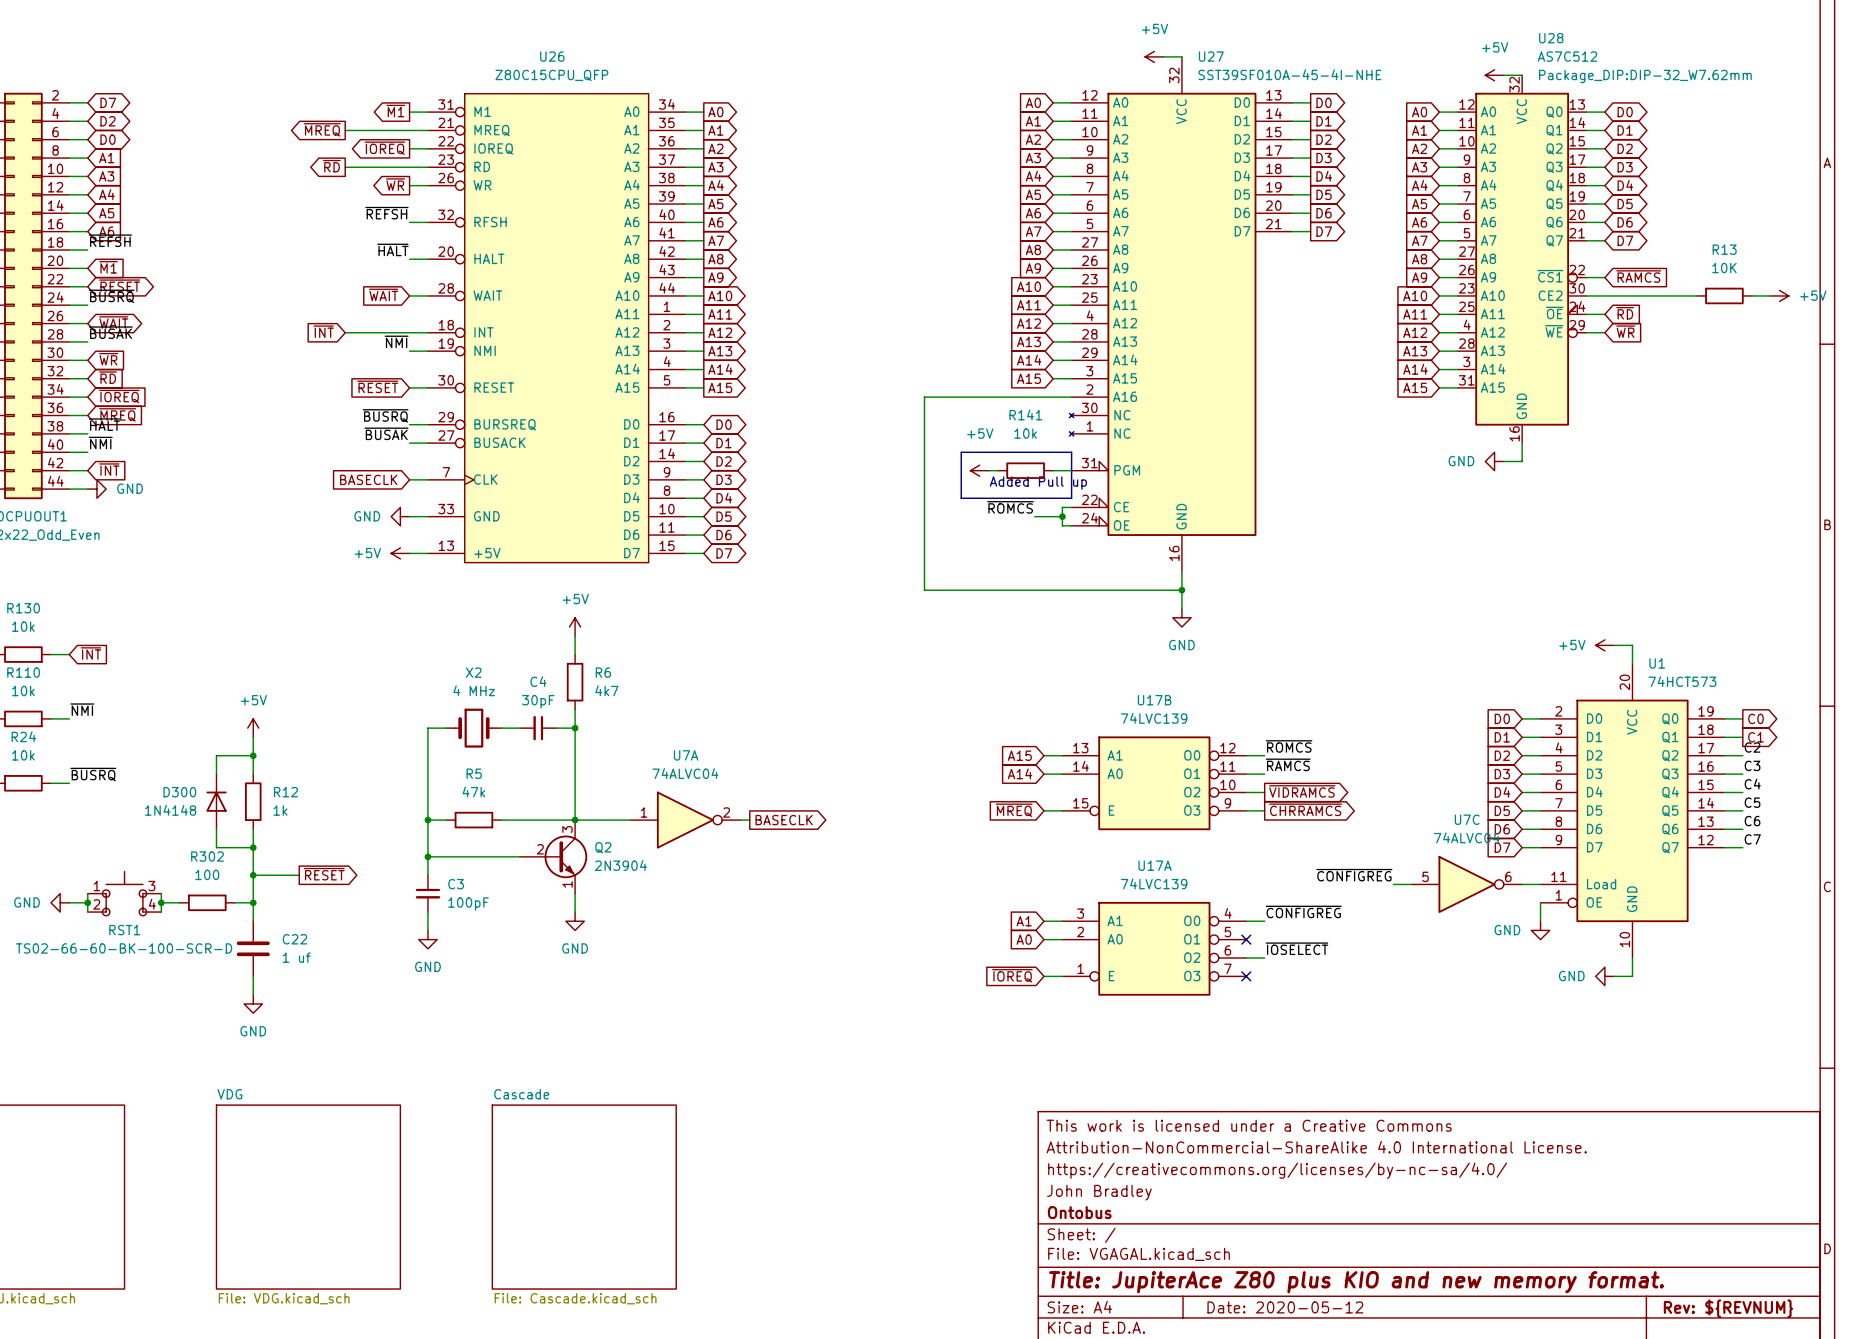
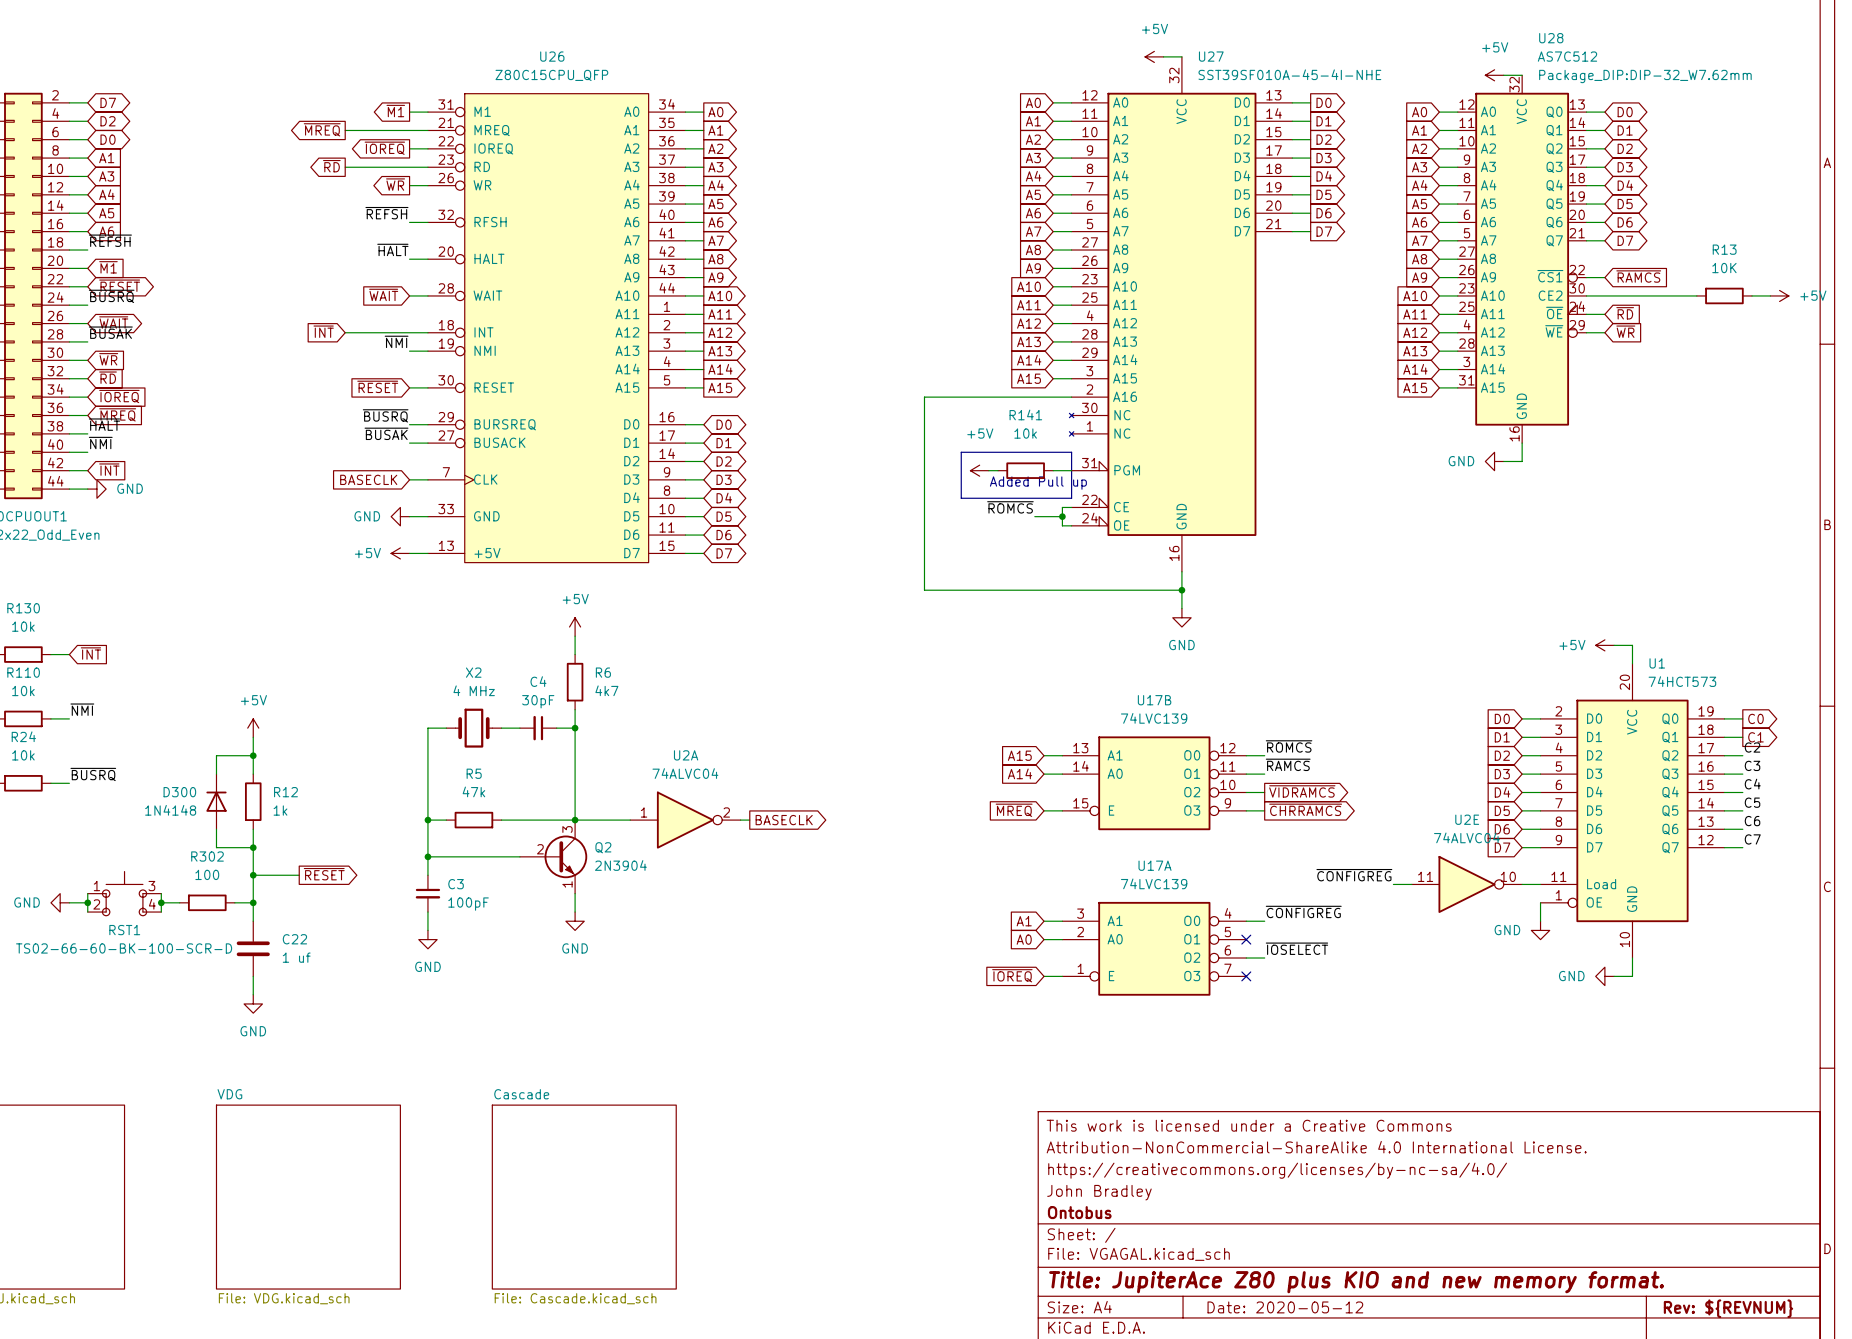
U7A name: U7A (686, 755) -> U2A (686, 755)
U7C name: U7C (1467, 819) -> U2E (1467, 819)
U7C pin number: 5 (1425, 876) -> 11 (1425, 876)
U7C pin number: 6 (1508, 876) -> 10 (1508, 876)

